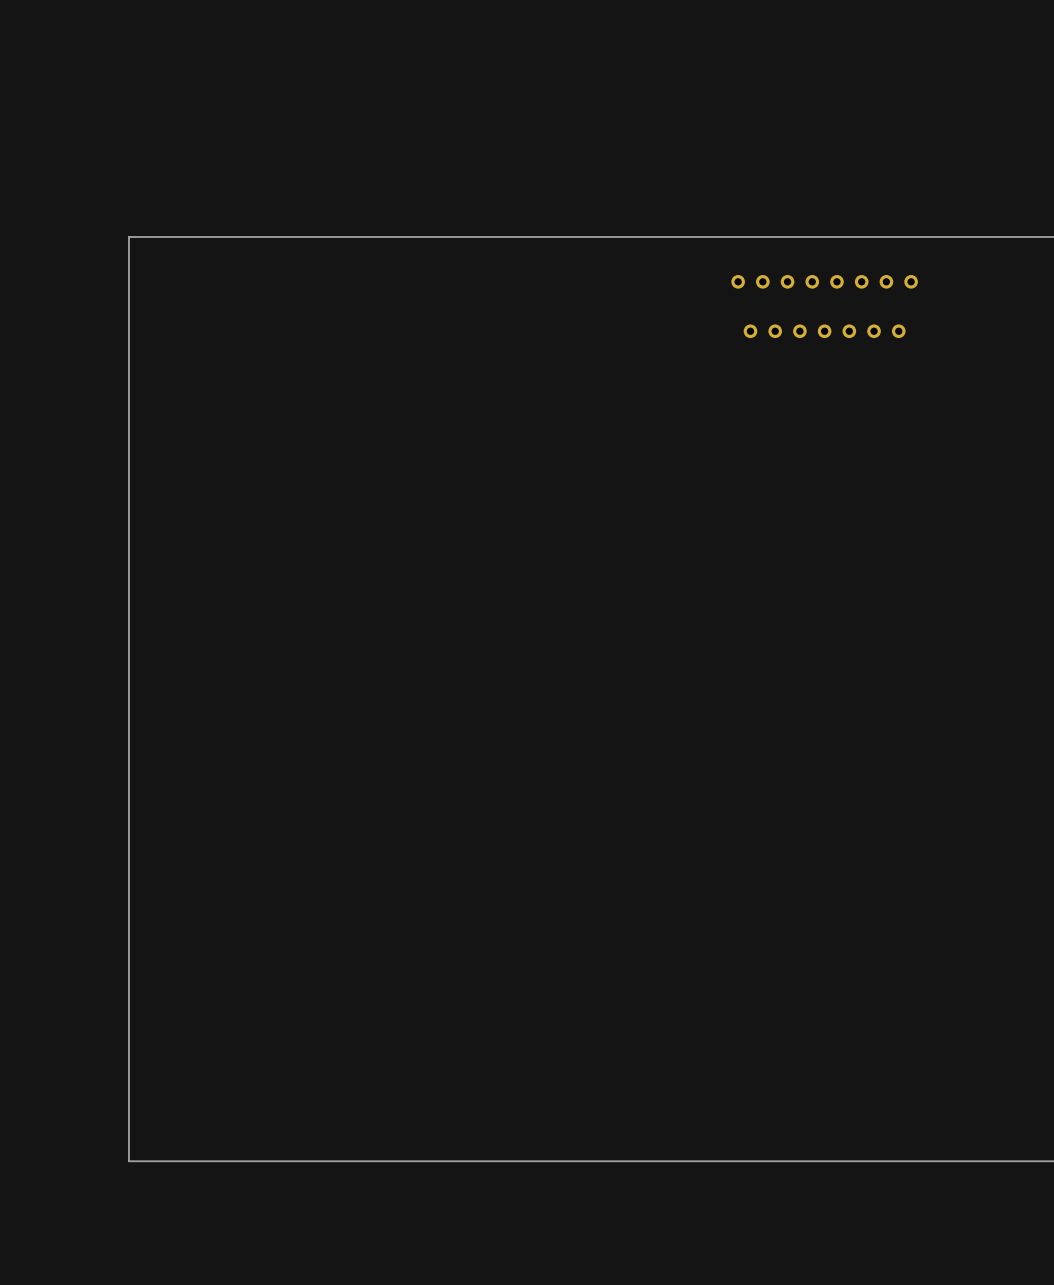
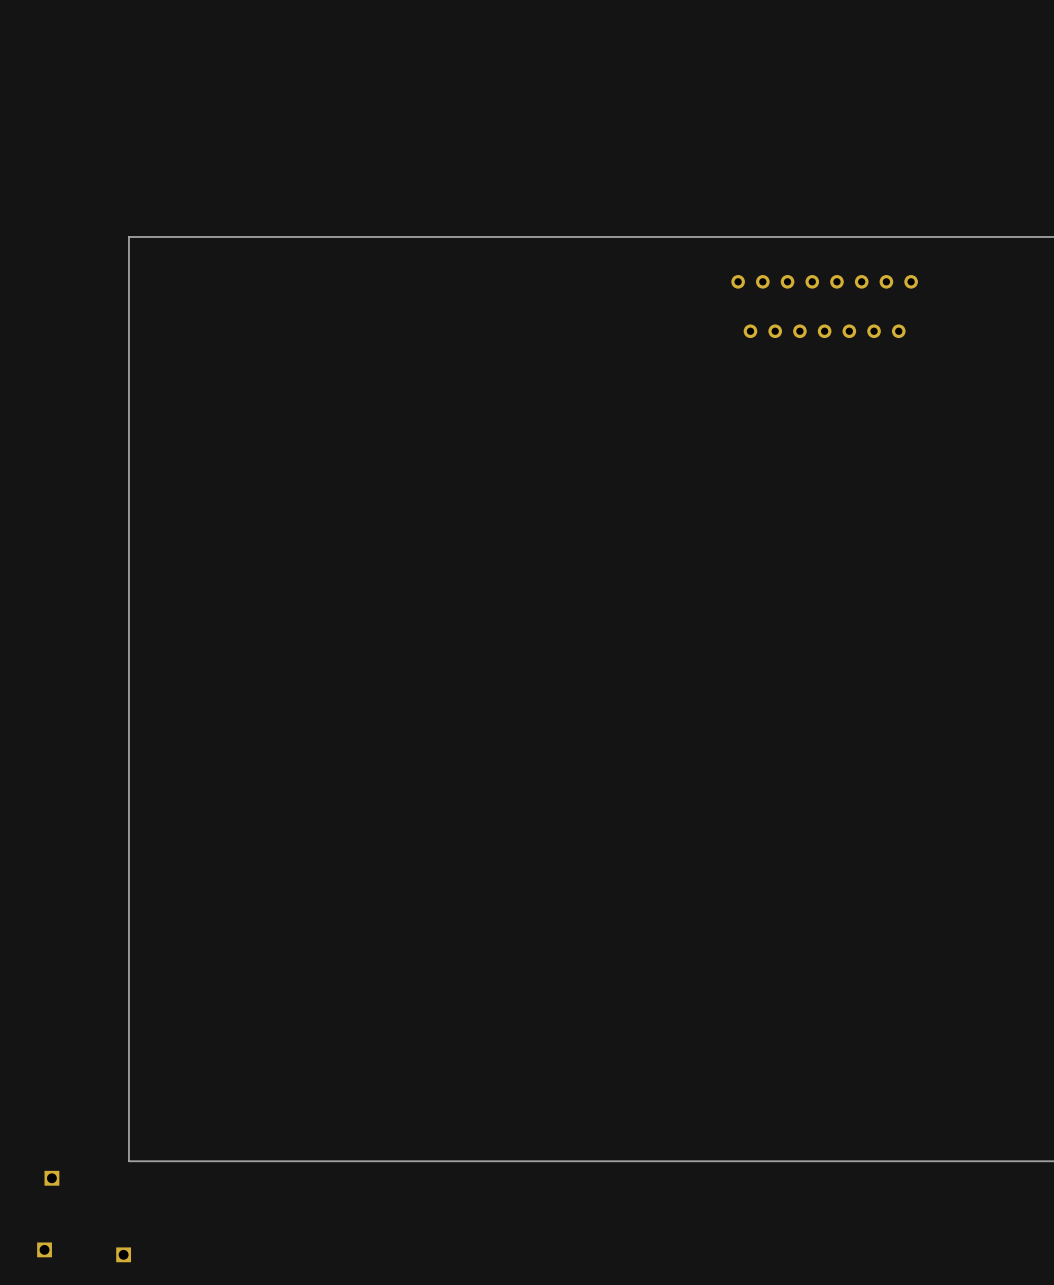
part: none -> (51, 1178)
part: none -> (44, 1249)
part: none -> (123, 1254)

